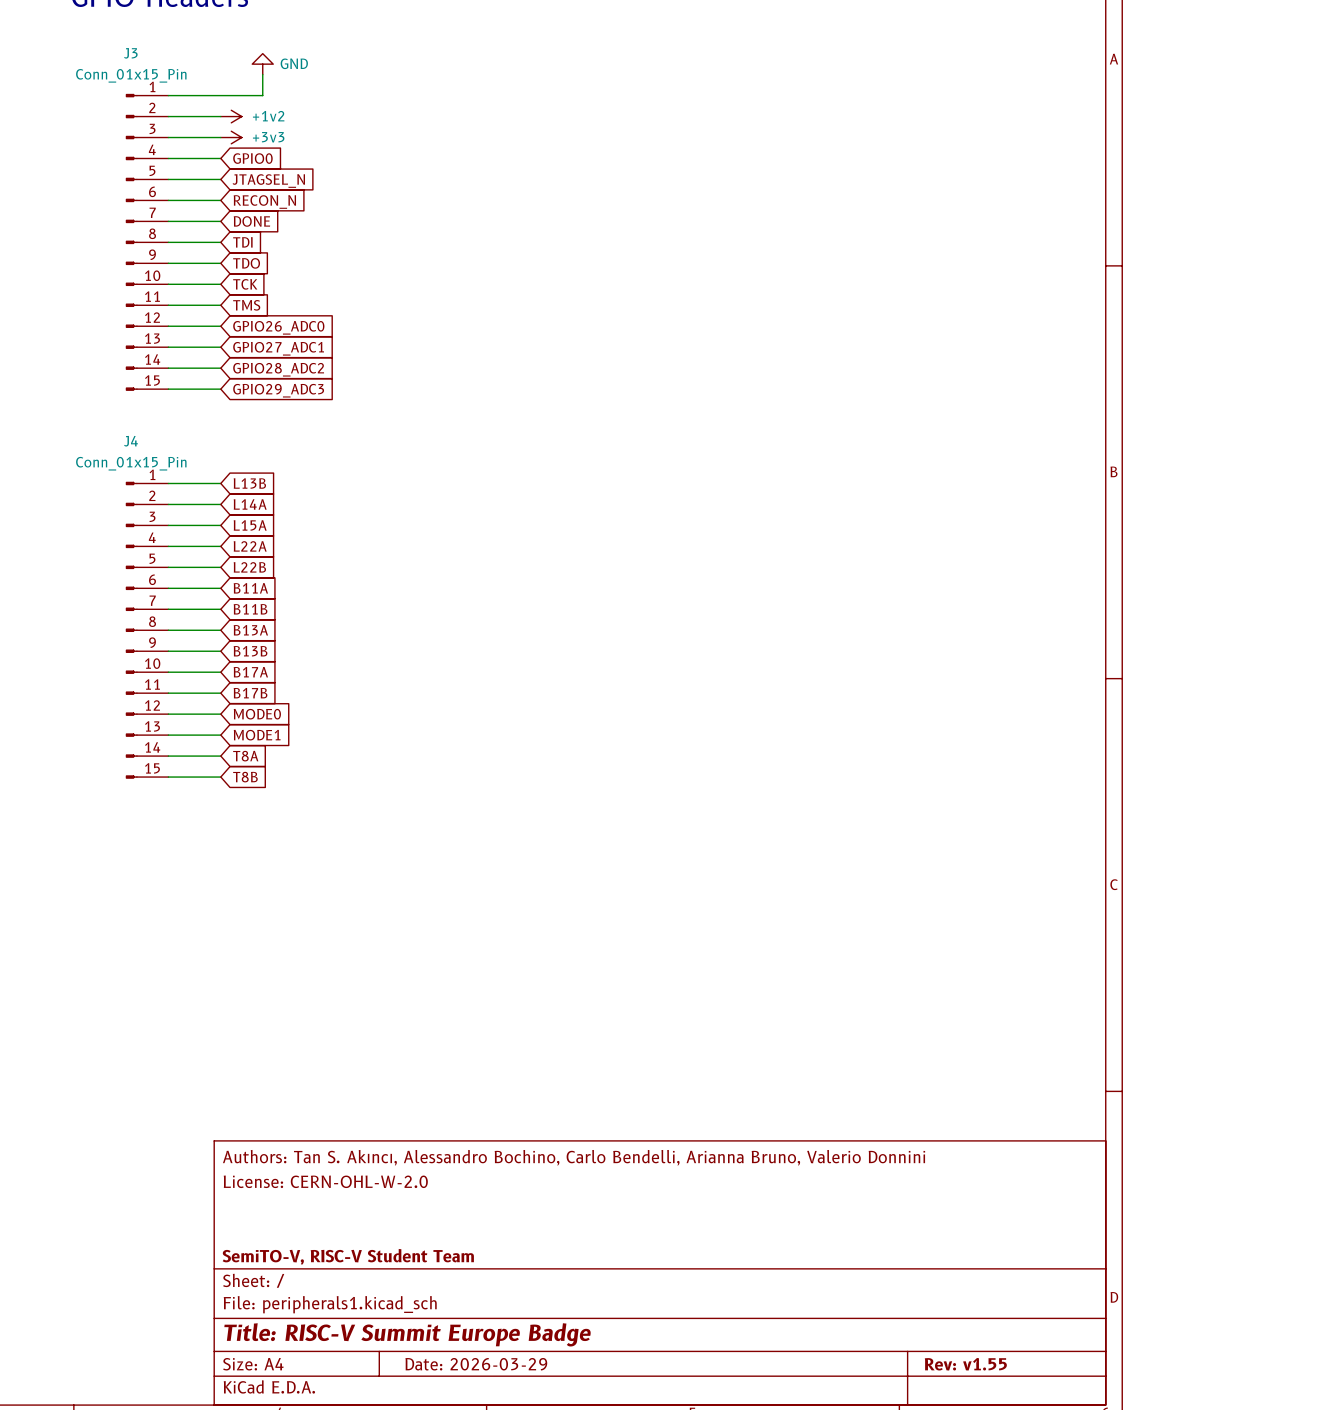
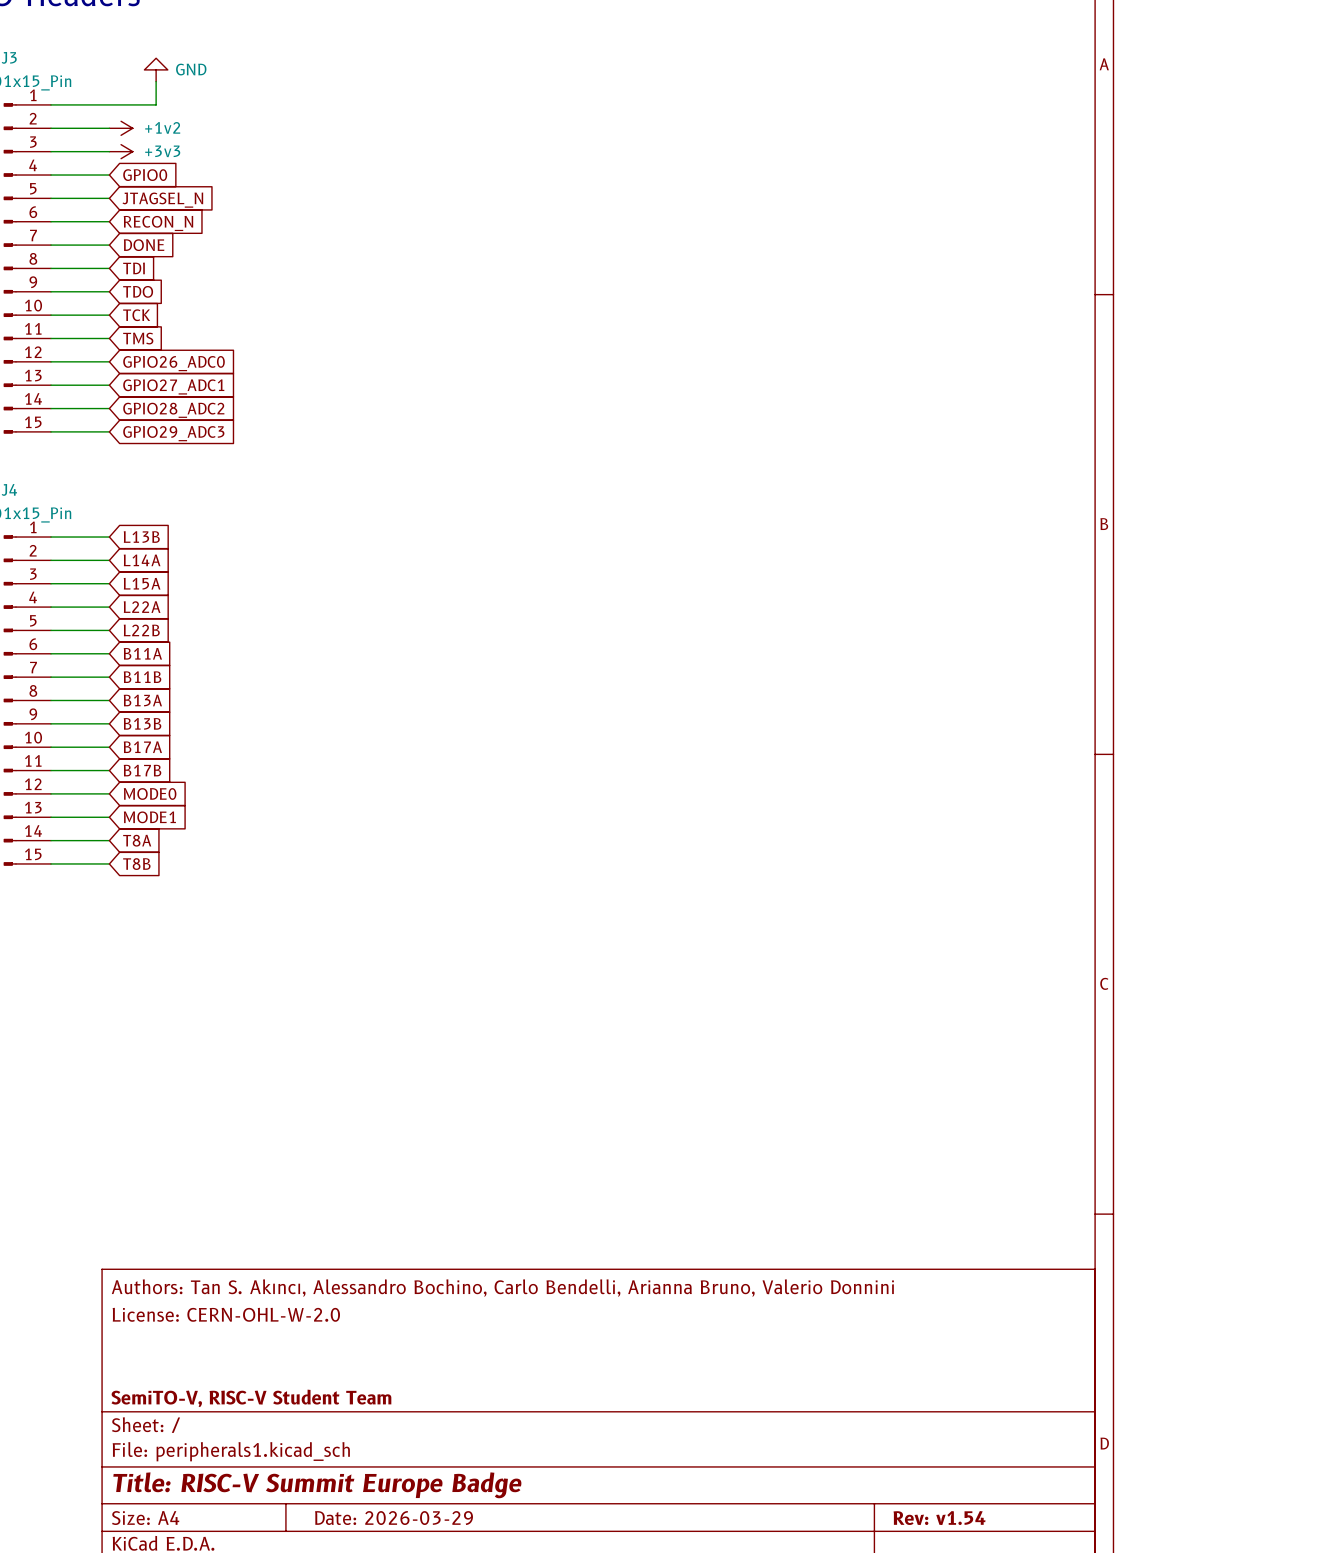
title block: Rev: v1.55 (965, 1364) -> Rev: v1.54 (939, 1518)

